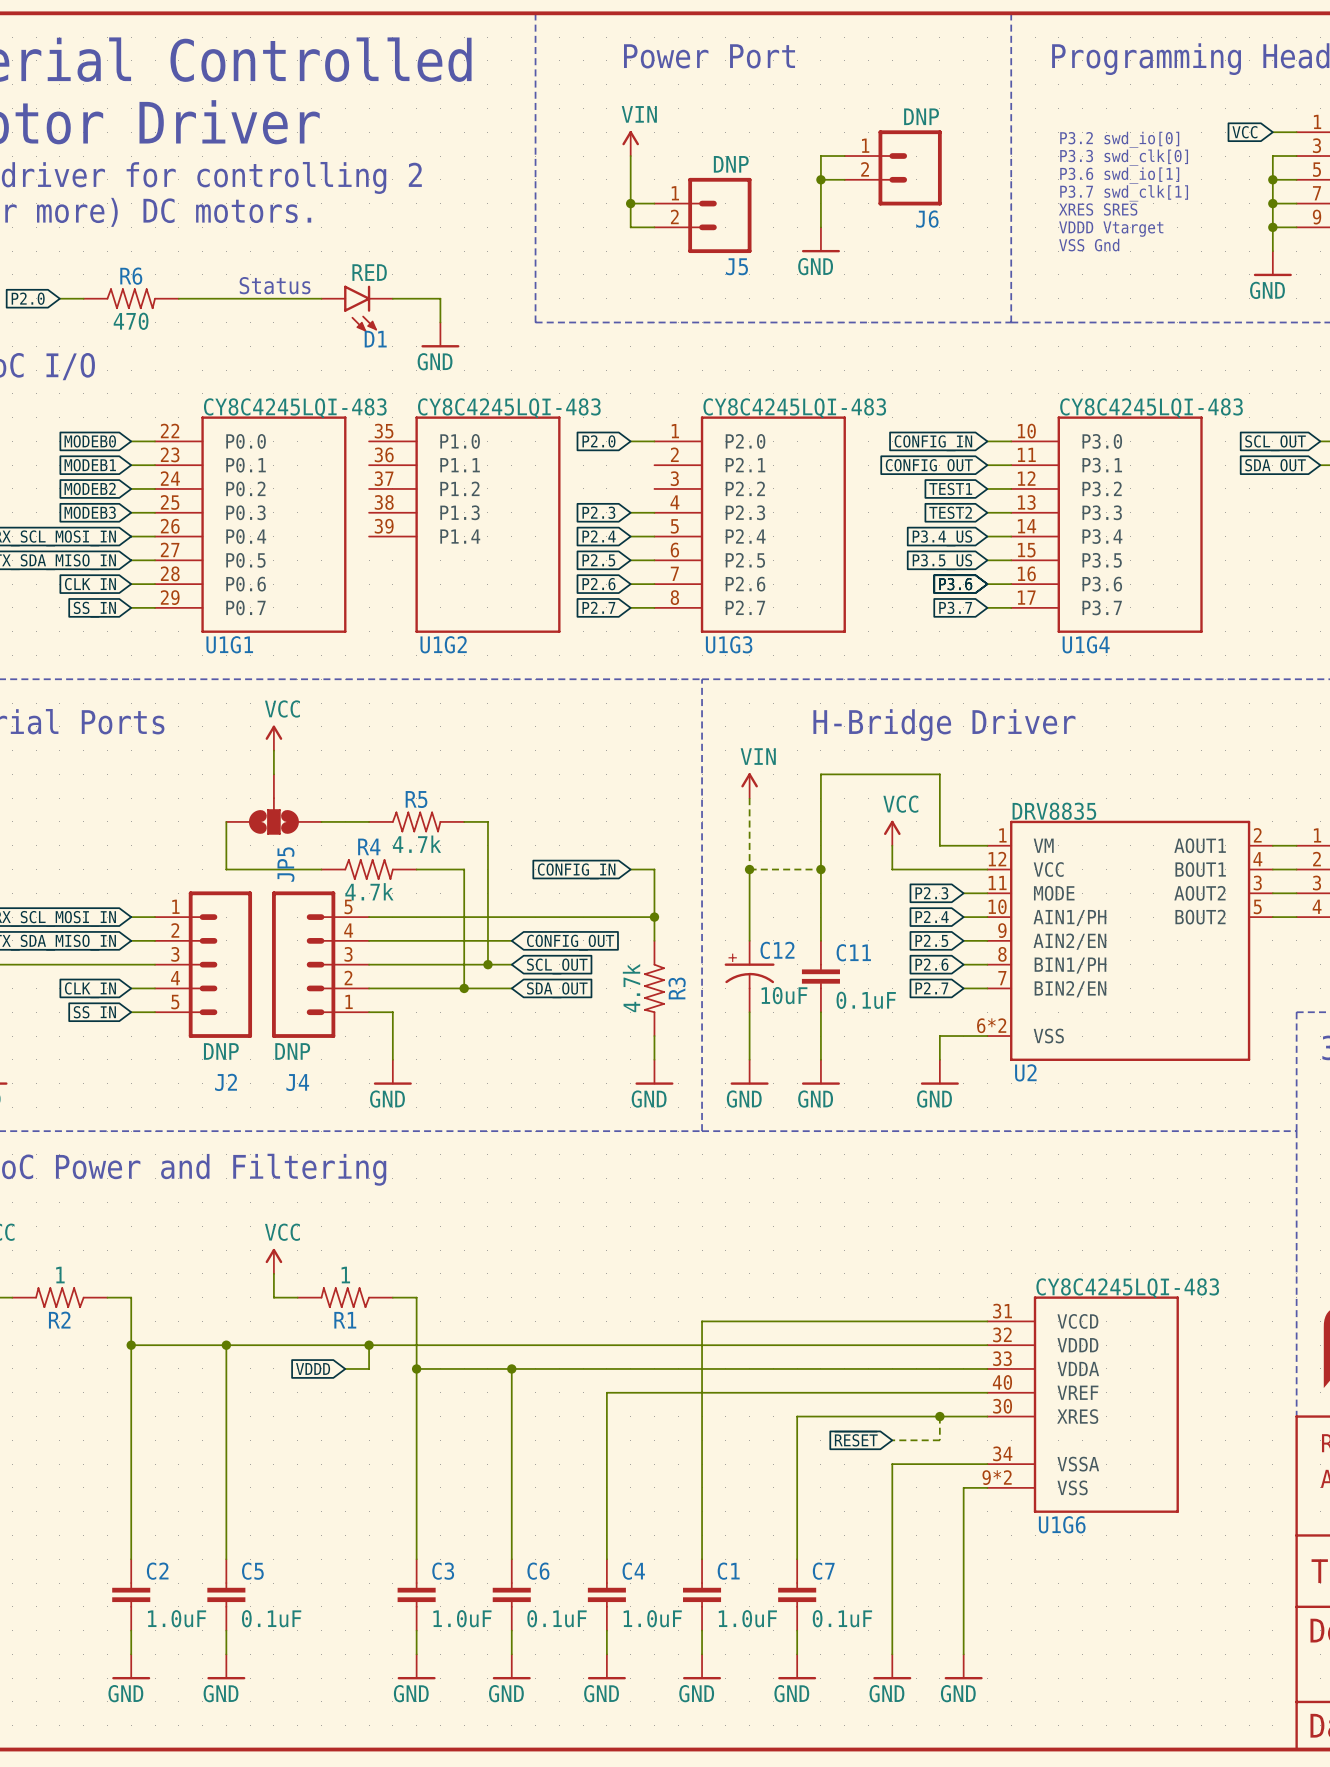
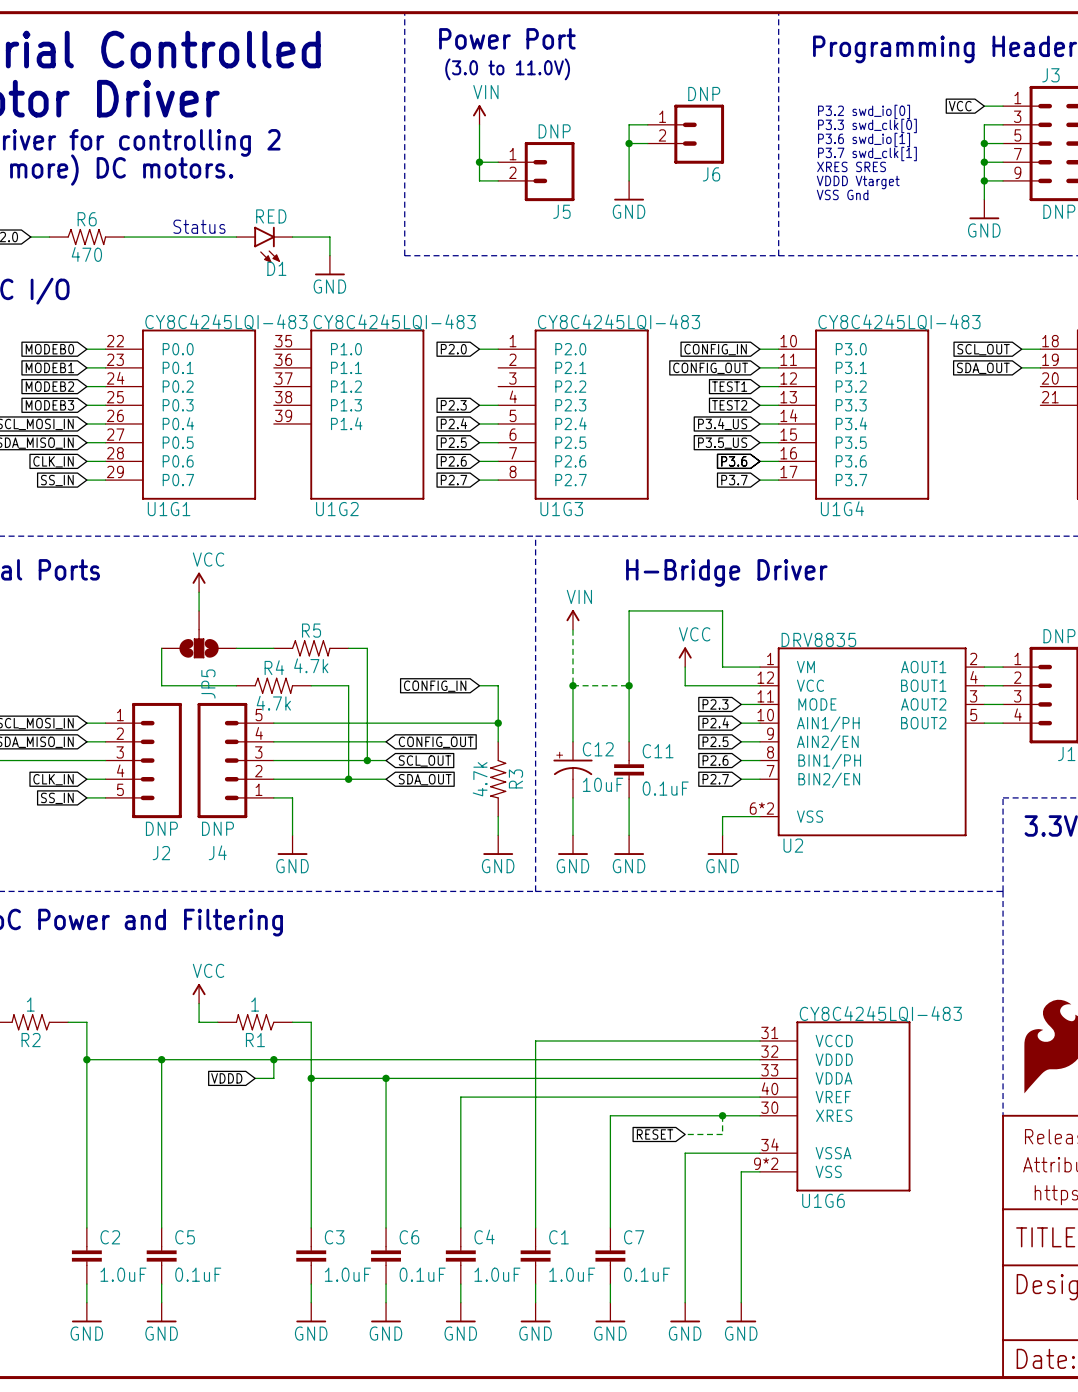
text position: Power Port (709, 56) -> Power Port (507, 38)
text: none -> (3.0 to 11.0V) (507, 69)

